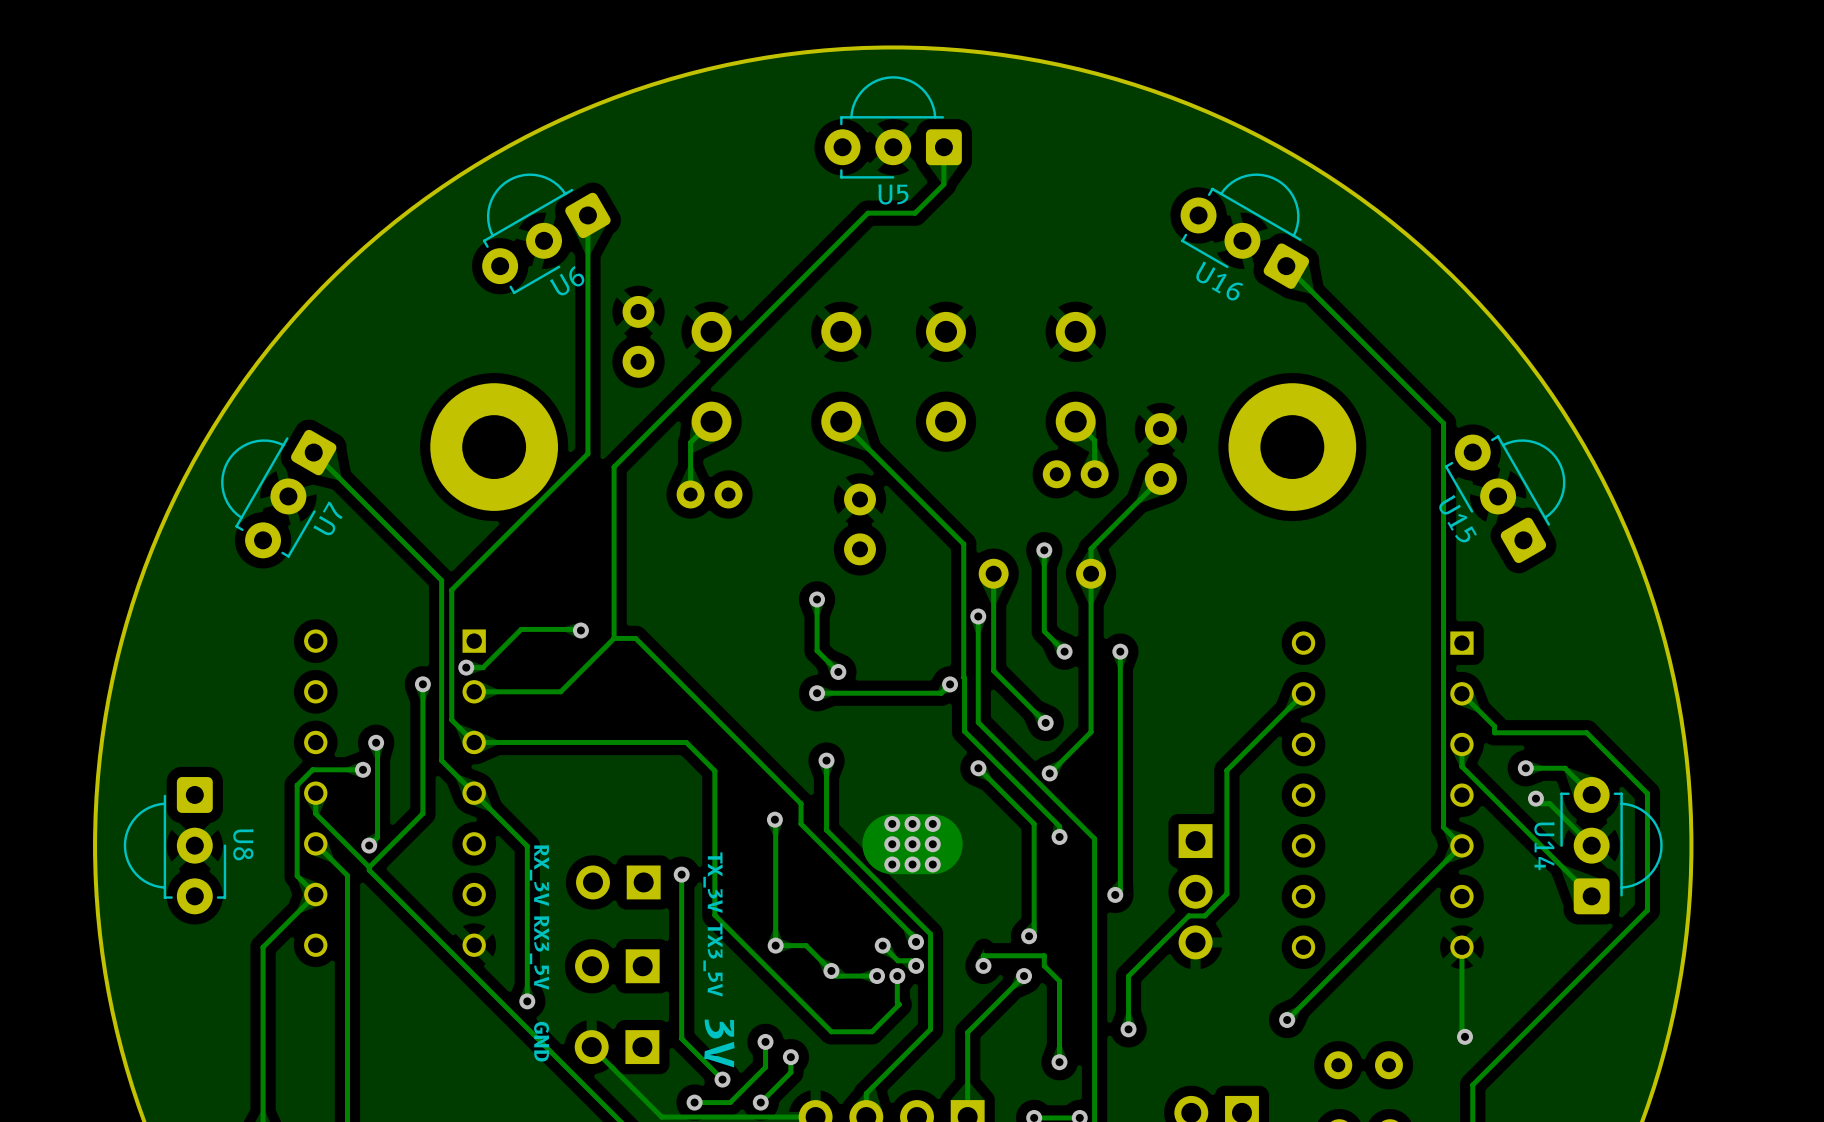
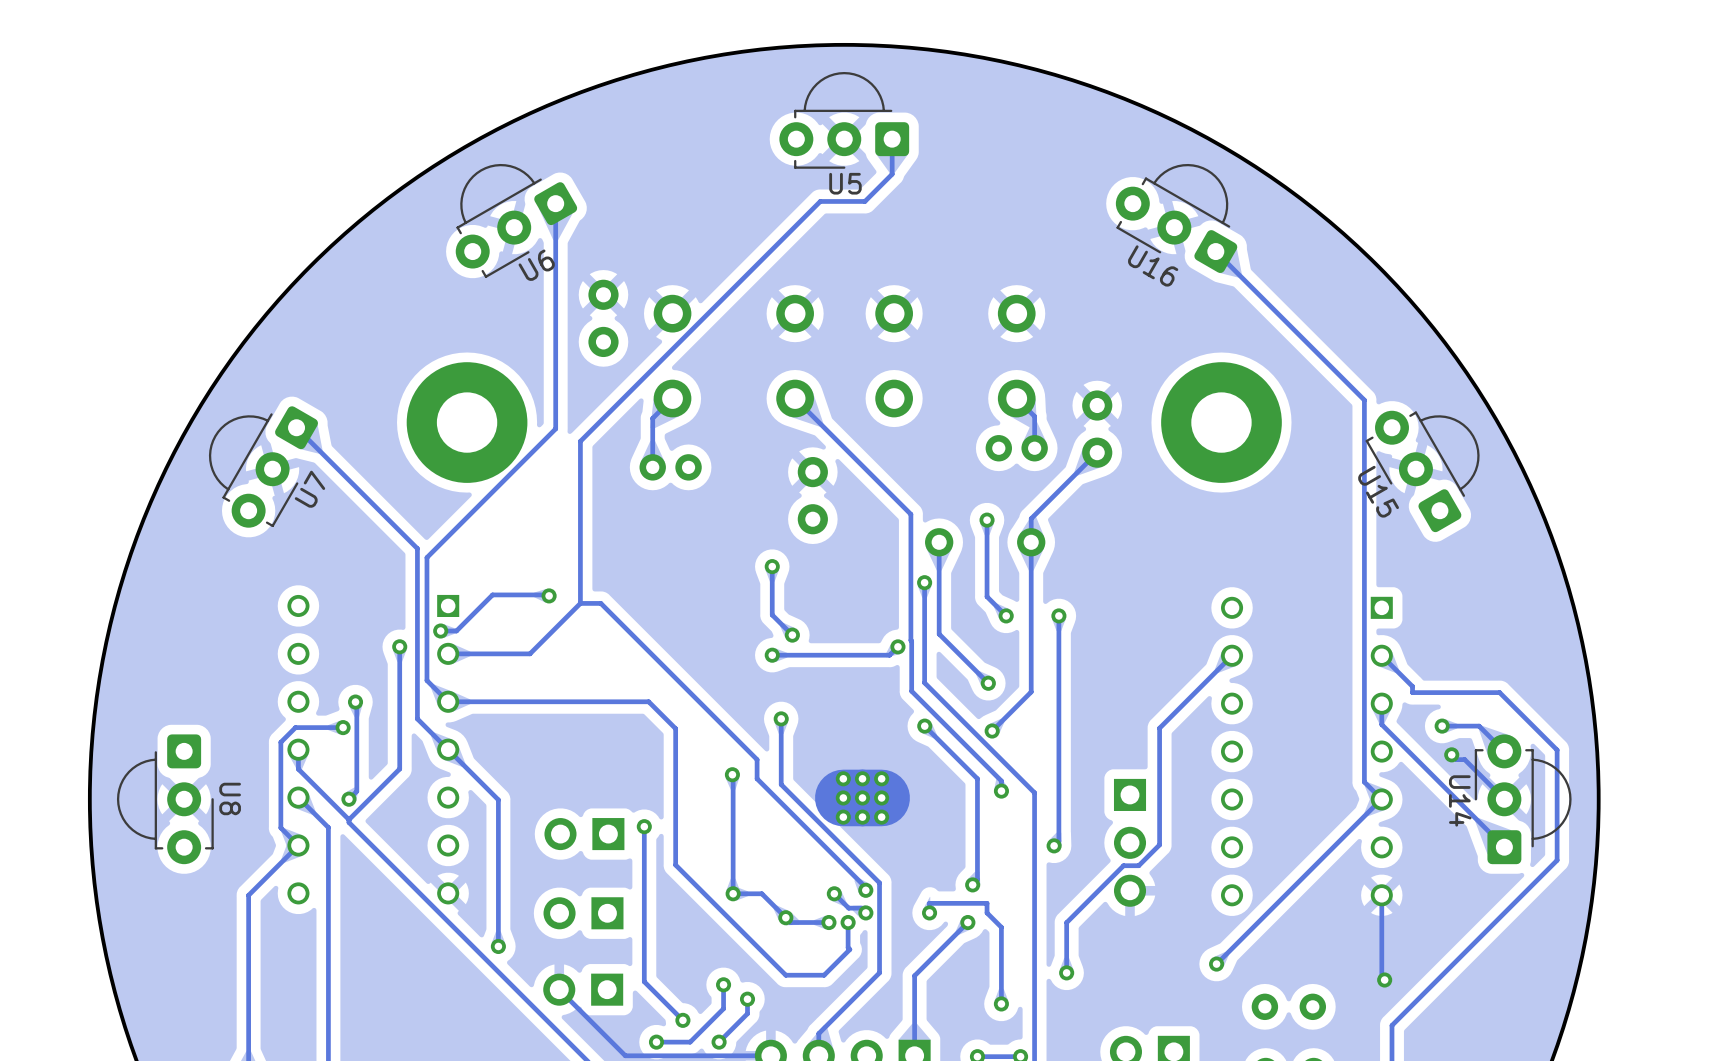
text: RX_3V (539, 875) -> none
text: TX_3V (713, 882) -> none
text: RX3_5V (539, 952) -> none
text: TX3_5V (713, 959) -> none
text: GND (541, 1041) -> none
text: 3V (719, 1043) -> none

